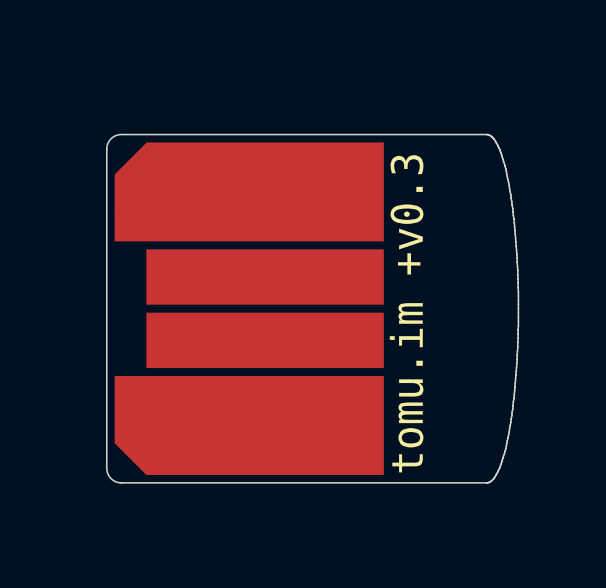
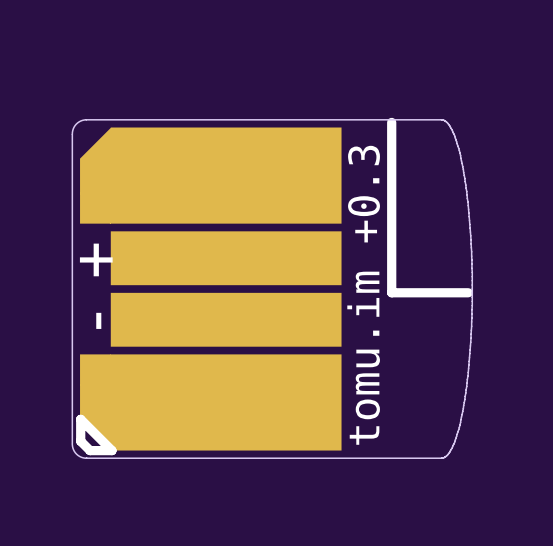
line: none -> (391, 122) (391, 292) (468, 292)
text: none -> + (96, 259)
text: tomu.im +v0.3 (406, 313) -> tomu.im +0.3 (363, 295)
text: none -> - (98, 320)
line: none -> (80, 419) (80, 441) (90, 450) (111, 450) (80, 419)

